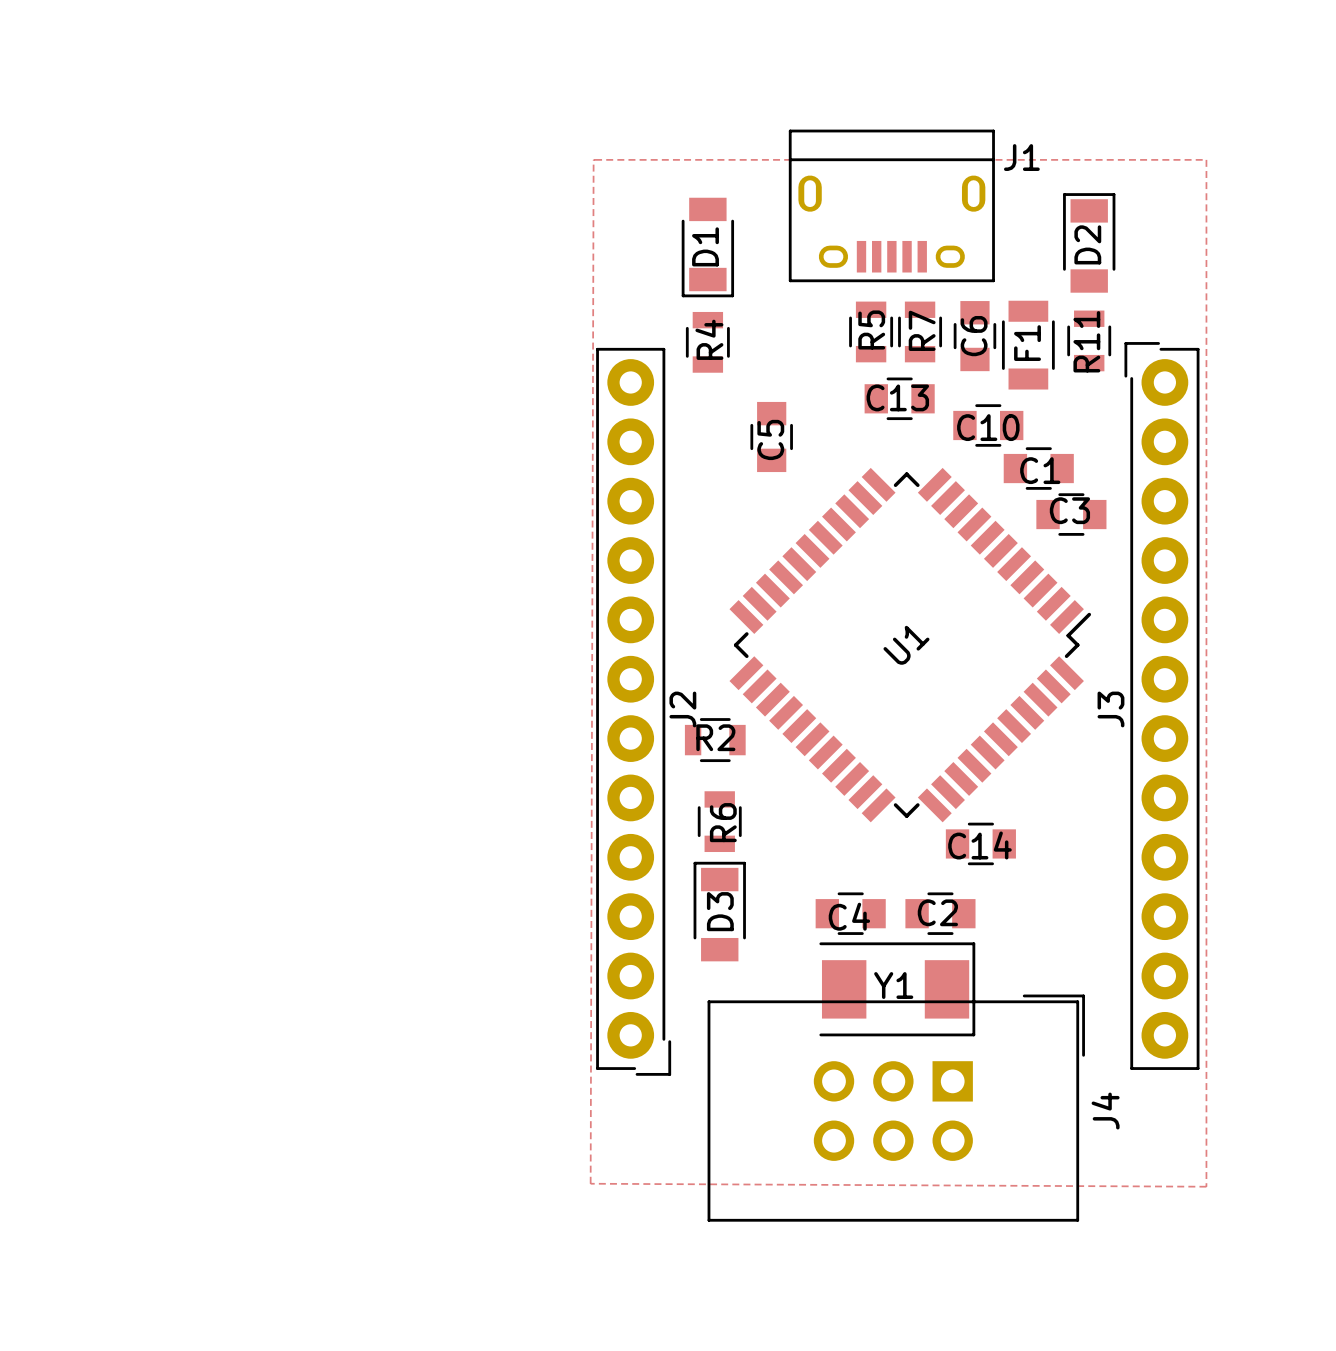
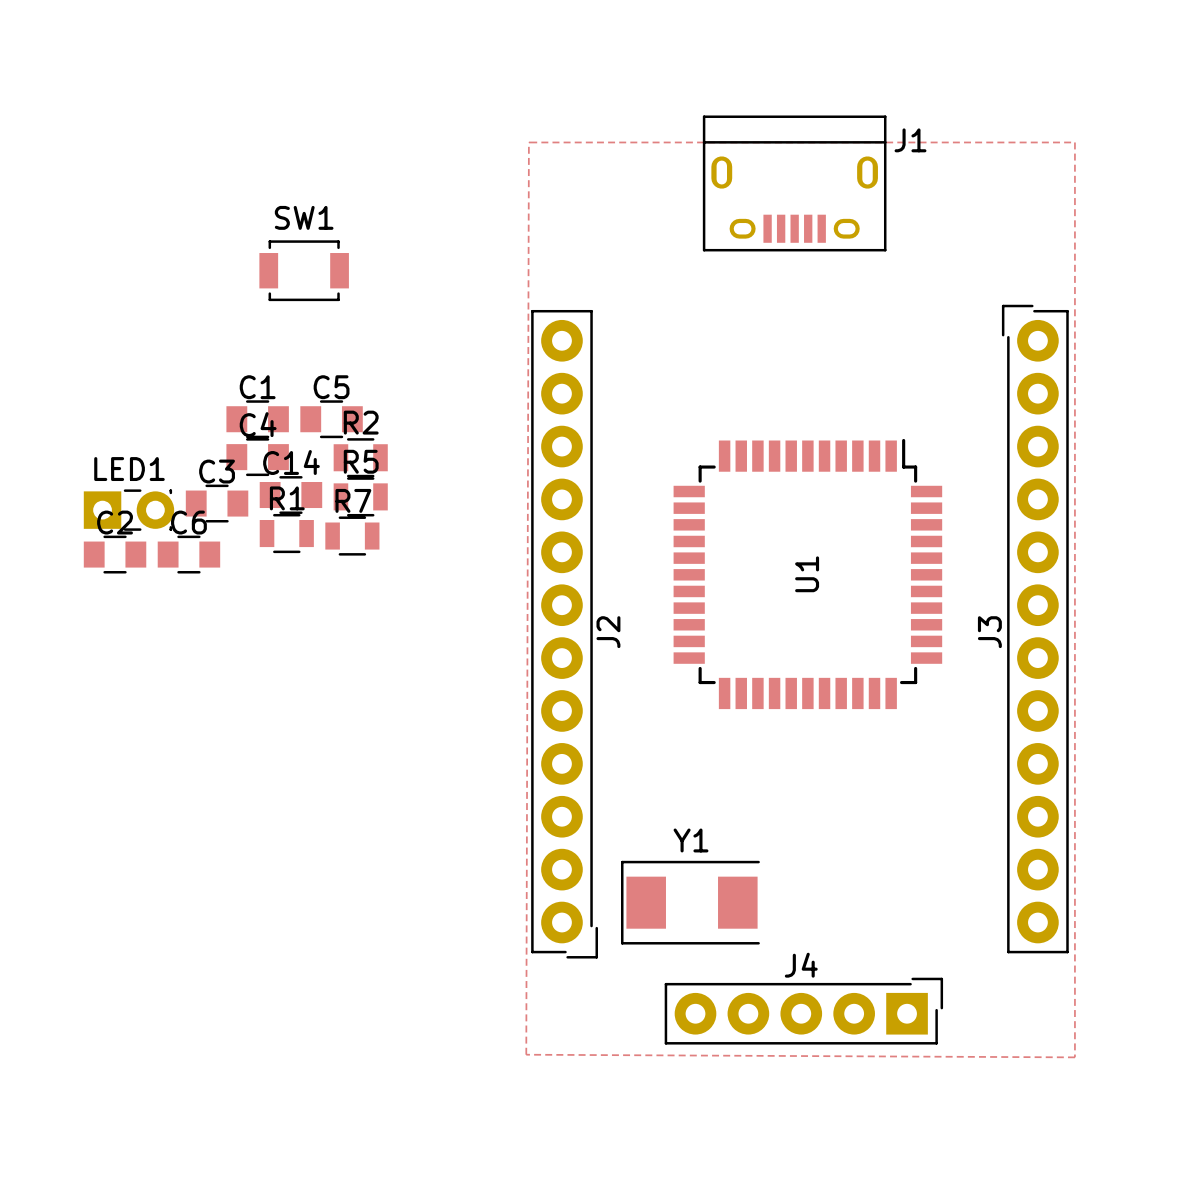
D2: (1089, 242) -> none
D1: (707, 247) -> none
SW1: none -> (304, 270)
R5 rotation: 0° (871, 331) -> 90° clockwise (360, 496)
R5 position: (871, 331) -> (360, 496)
R7 rotation: 0° (920, 331) -> 90° clockwise (352, 536)
R7 position: (920, 331) -> (352, 536)
C6 rotation: 0° (974, 336) -> 90° clockwise (188, 554)
C6 position: (974, 336) -> (188, 554)
R11: (1089, 340) -> none
R4: (707, 342) -> none
F1: (1028, 345) -> none
C13: (899, 398) -> none
C10: (988, 425) -> none
C5 rotation: 0° (771, 437) -> 90° clockwise (331, 419)
C5 position: (771, 437) -> (331, 419)
C1 position: (1038, 468) -> (257, 419)
C1 name position: C1 (1040, 470) -> C1 (257, 387)
C3 name position: C3 (1069, 510) -> C3 (217, 471)
C3 position: (1071, 514) -> (217, 503)
LED1: none -> (128, 510)
R1: none -> (286, 533)
U1 rotation: 0° (910, 645) -> 45° counterclockwise (807, 574)
R2 name position: R2 (715, 737) -> R2 (361, 422)
R2 position: (715, 740) -> (360, 457)
R6: (719, 821) -> none
C14 position: (980, 843) -> (290, 495)
C14 name position: C14 (979, 845) -> C14 (291, 462)
D3: (719, 911) -> none
C2 name position: C2 (937, 912) -> C2 (115, 522)
C4 position: (850, 913) -> (257, 457)
C2 position: (940, 913) -> (115, 554)
C4 name position: C4 (849, 916) -> C4 (258, 424)
Y1 name position: Y1 (893, 985) -> Y1 (691, 840)
Y1 rotation: 0° (897, 989) -> 180° (690, 902)
Y1 position: (897, 989) -> (690, 902)
J4 footprint: [707, 994, 1085, 1222] -> [664, 977, 944, 1045]
J4 name position: J4 (1105, 1111) -> J4 (801, 965)

